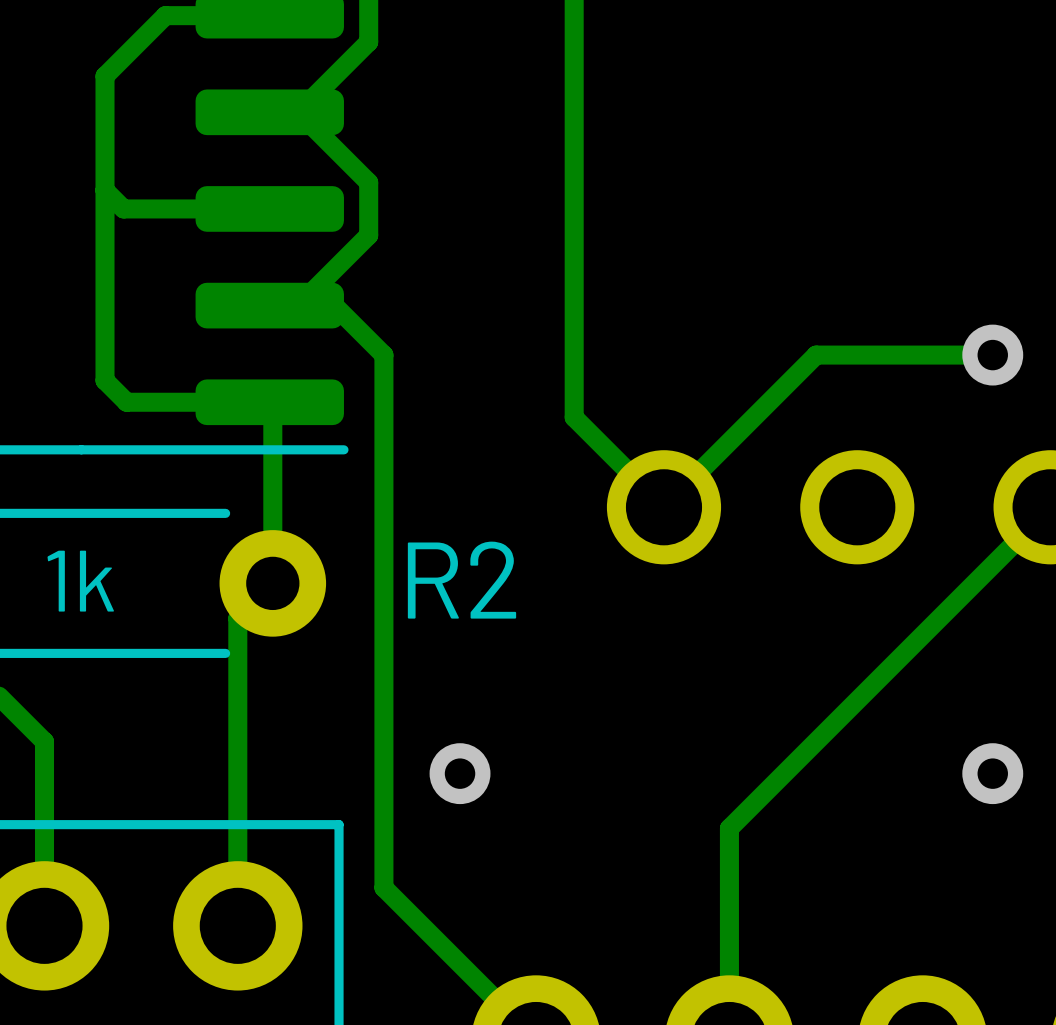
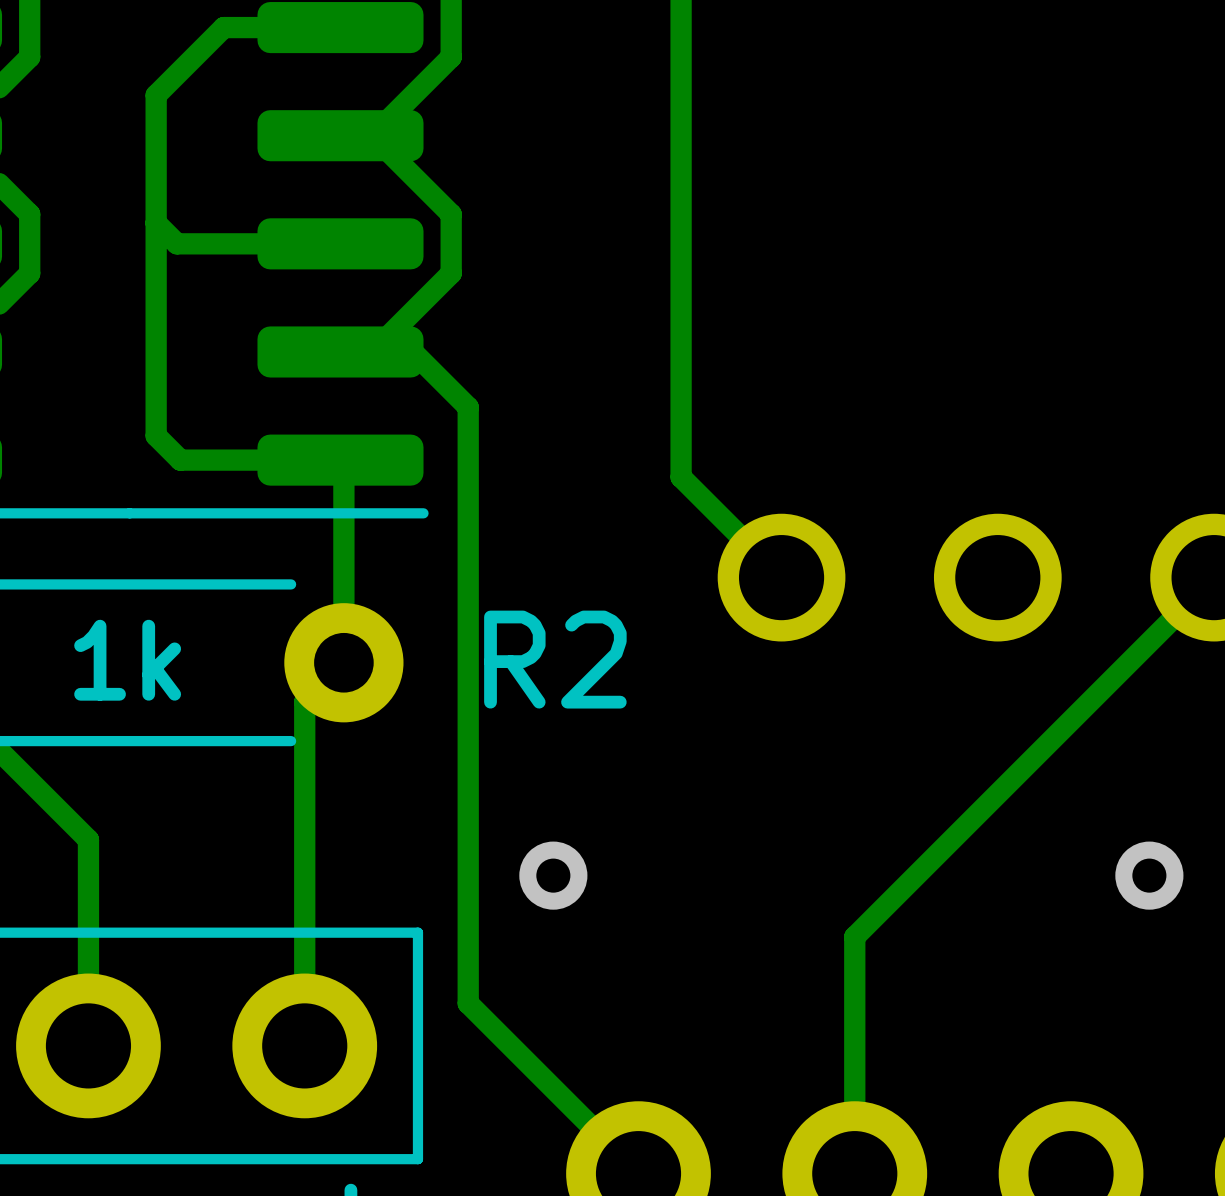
track: (992, 355) (816, 355) (663, 507) -> none
via: (992, 355) -> none

